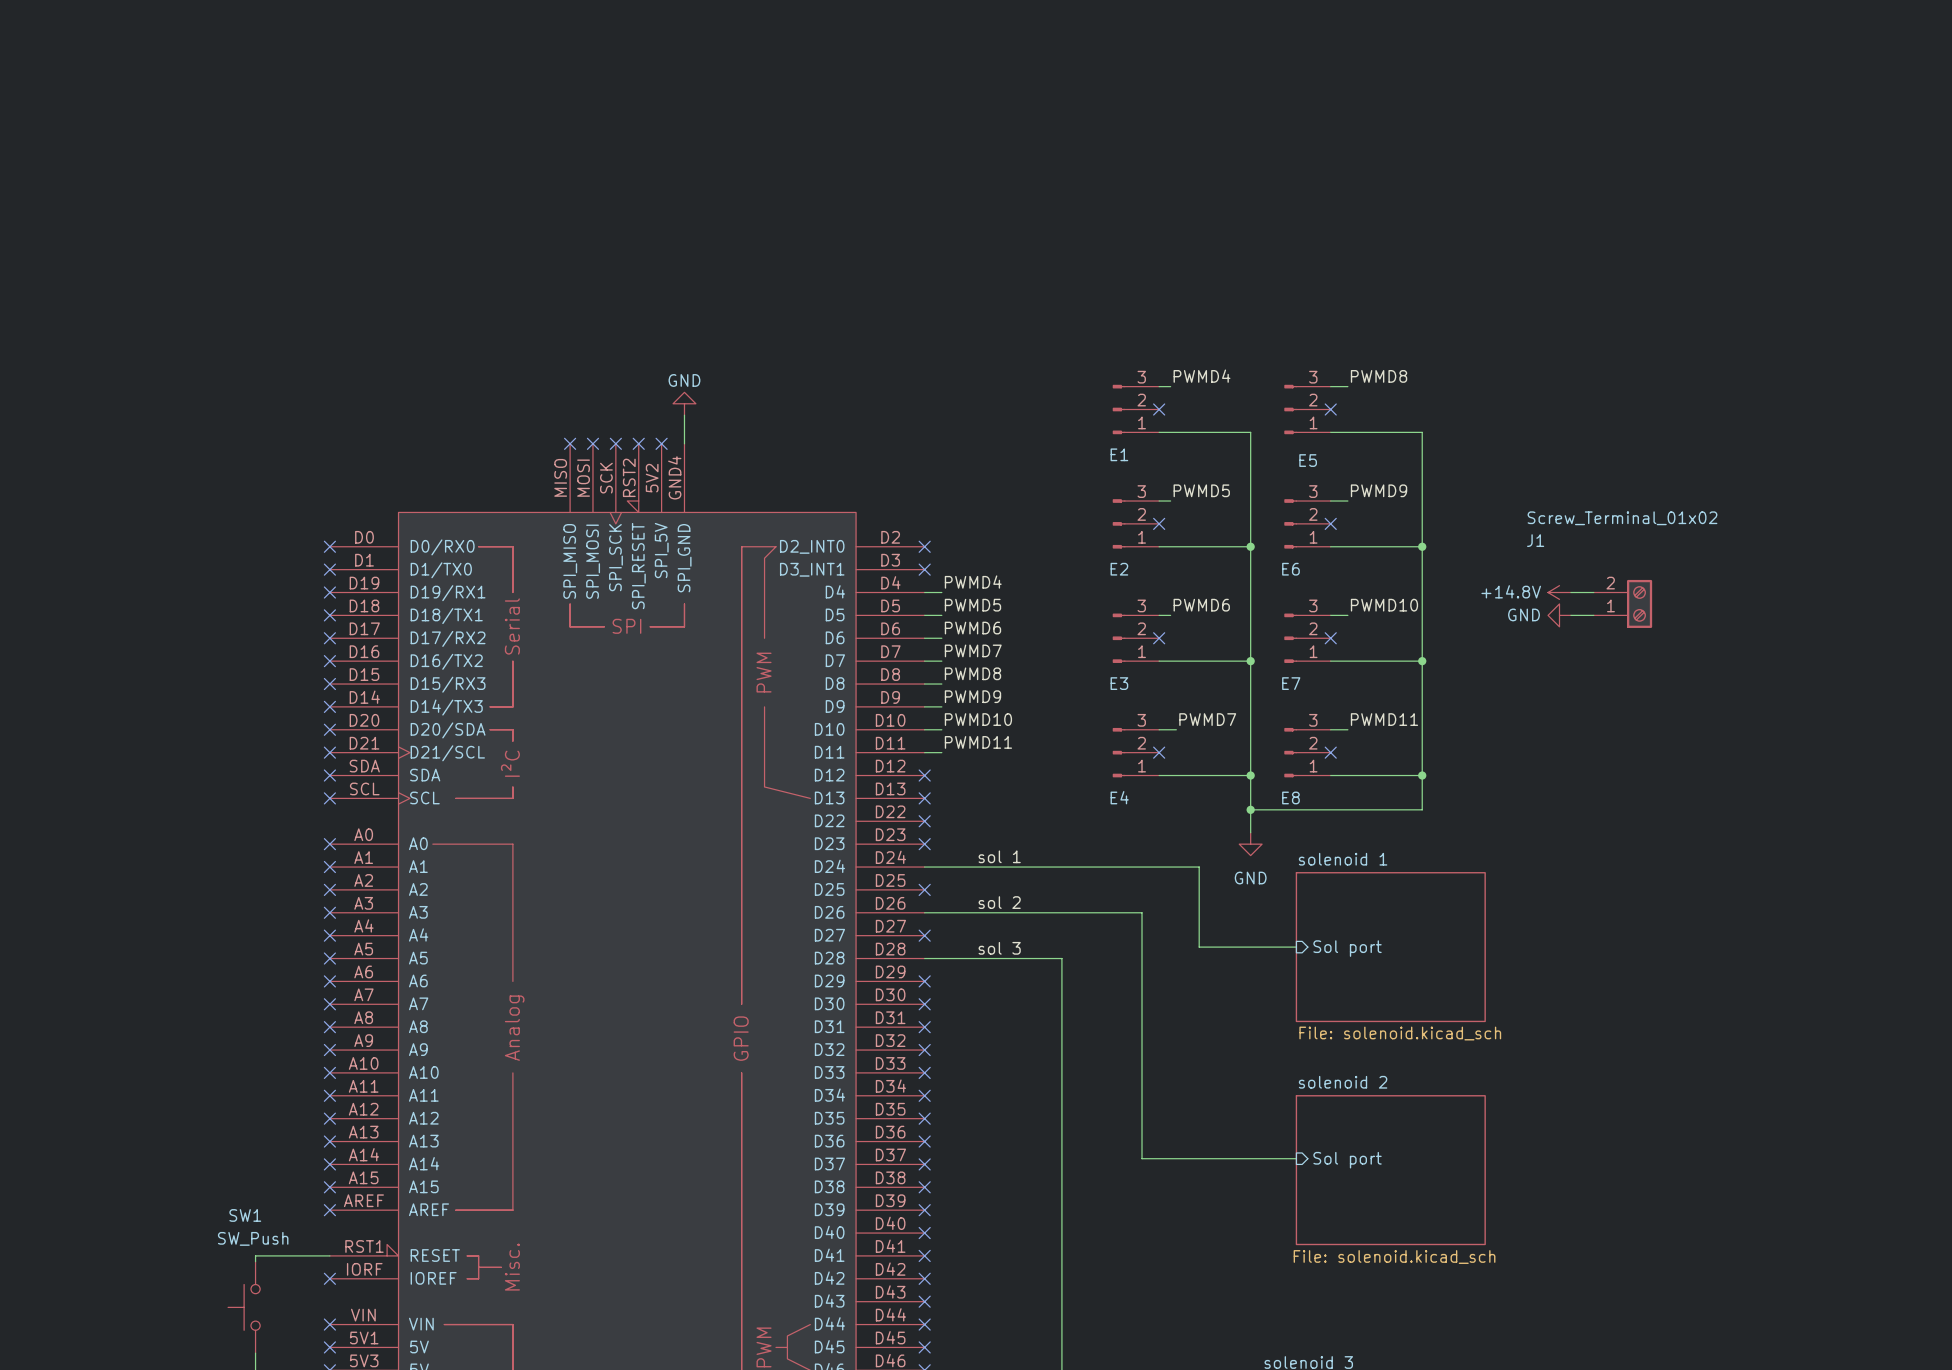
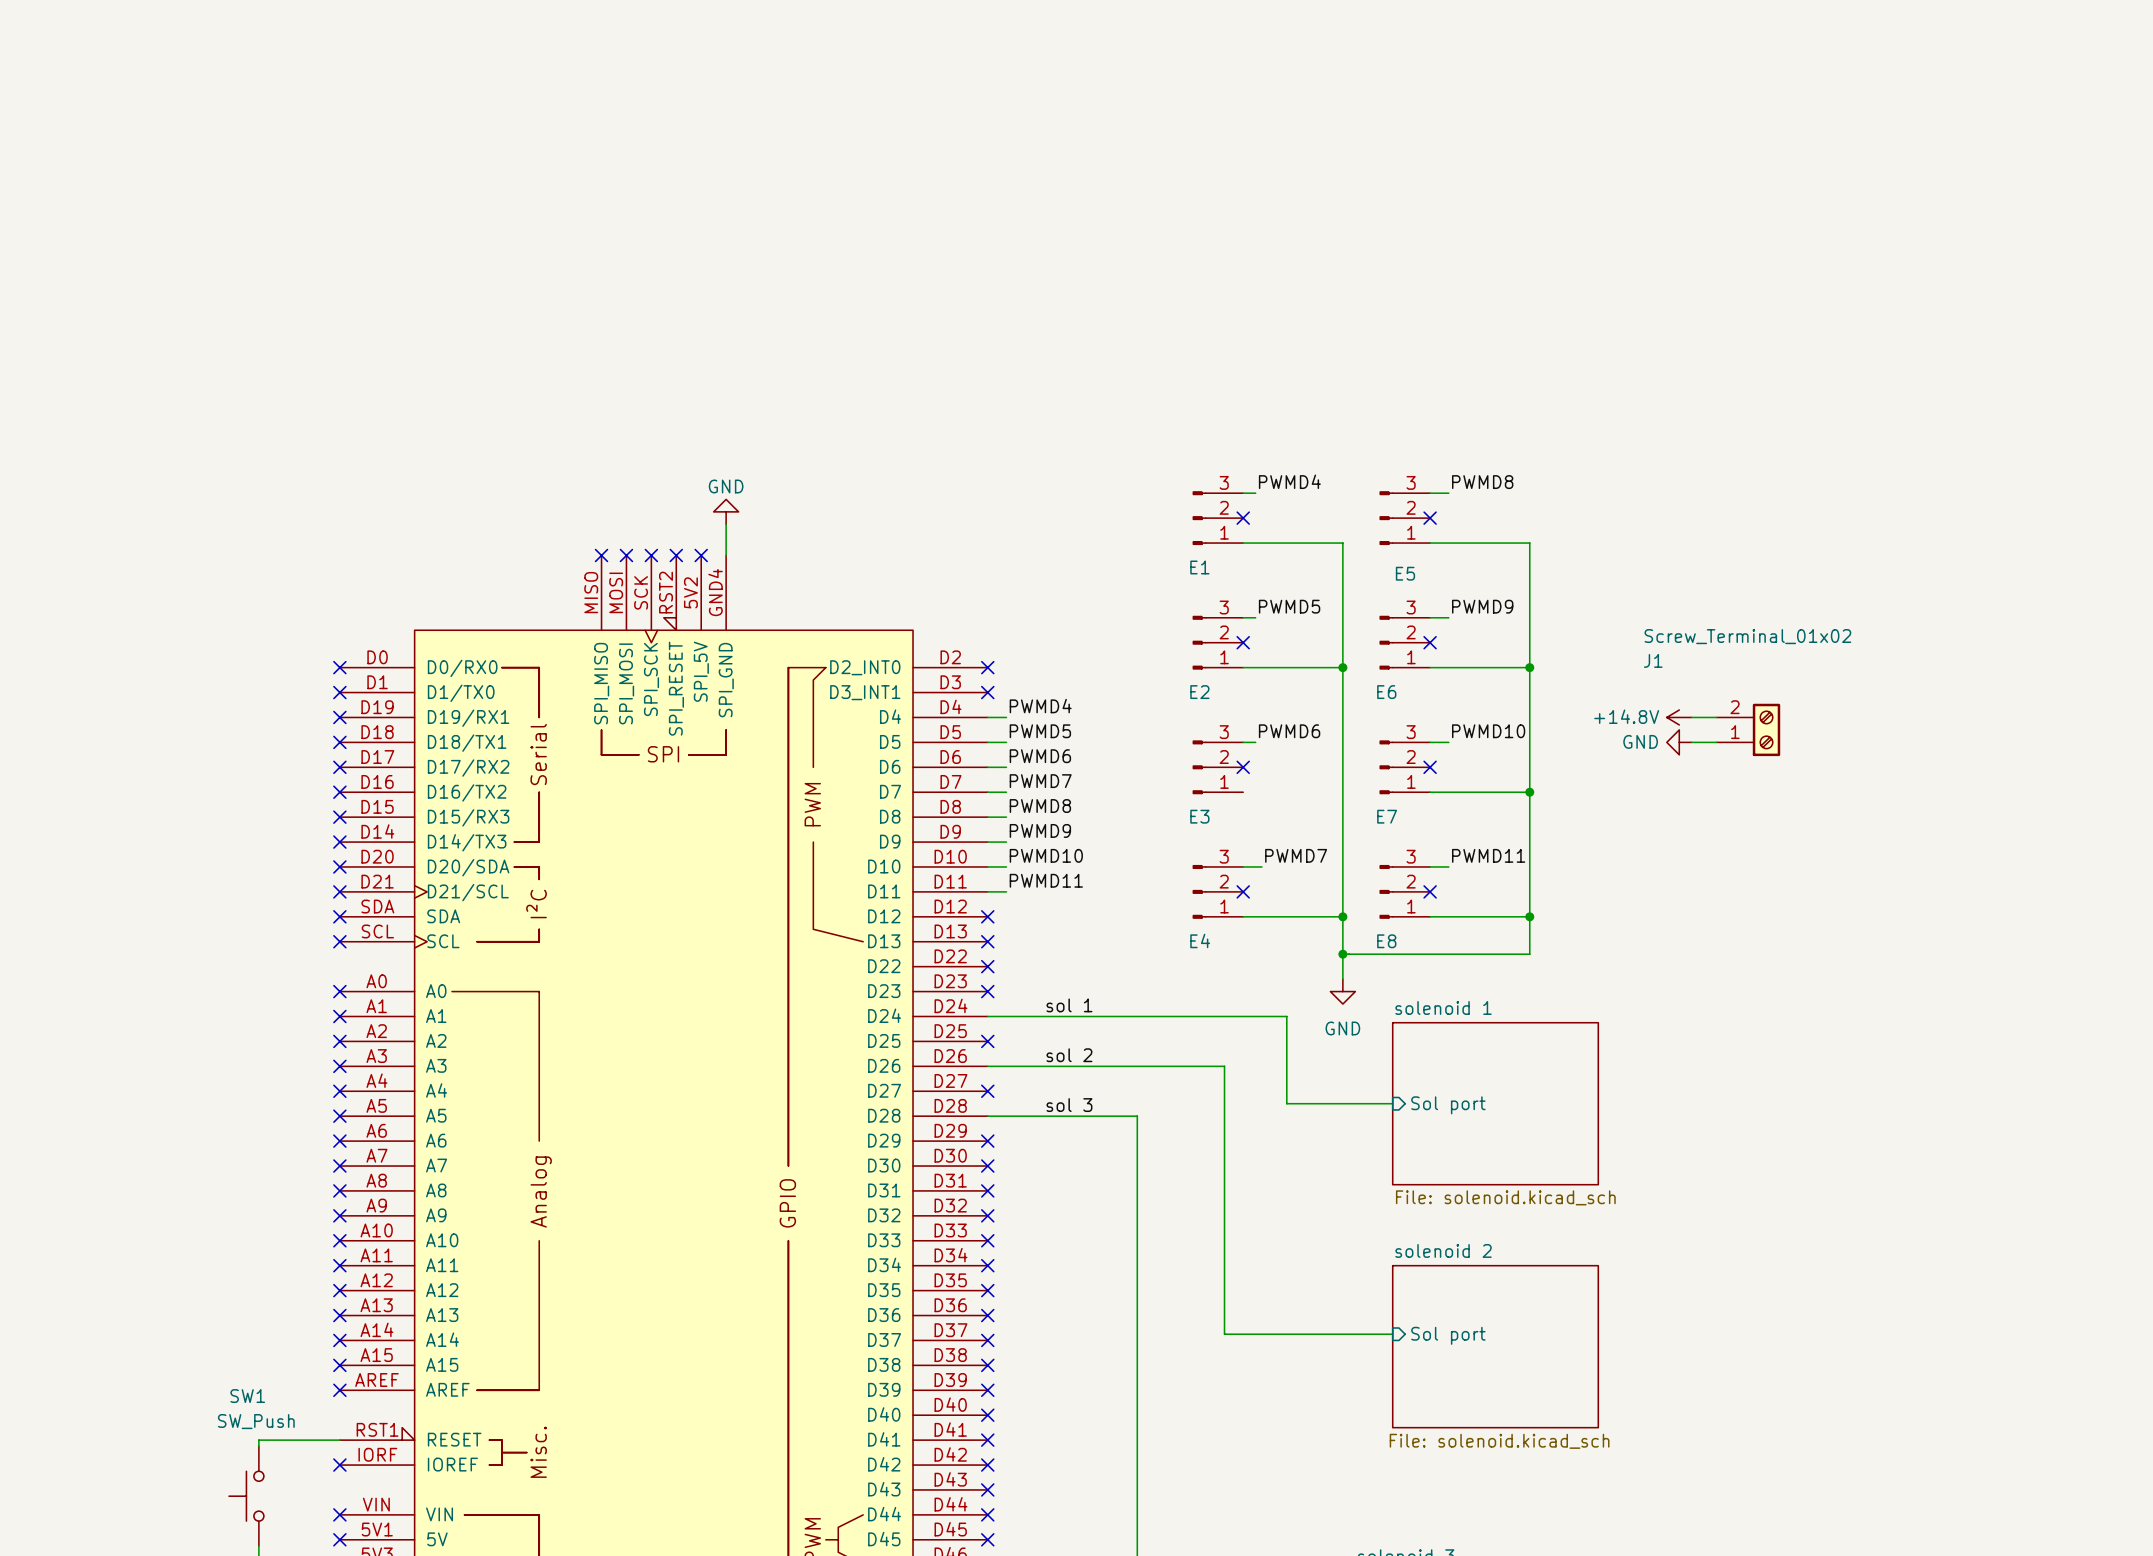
wire: (1159, 661) (1250, 661) -> none
junction: (1250, 661) -> none

